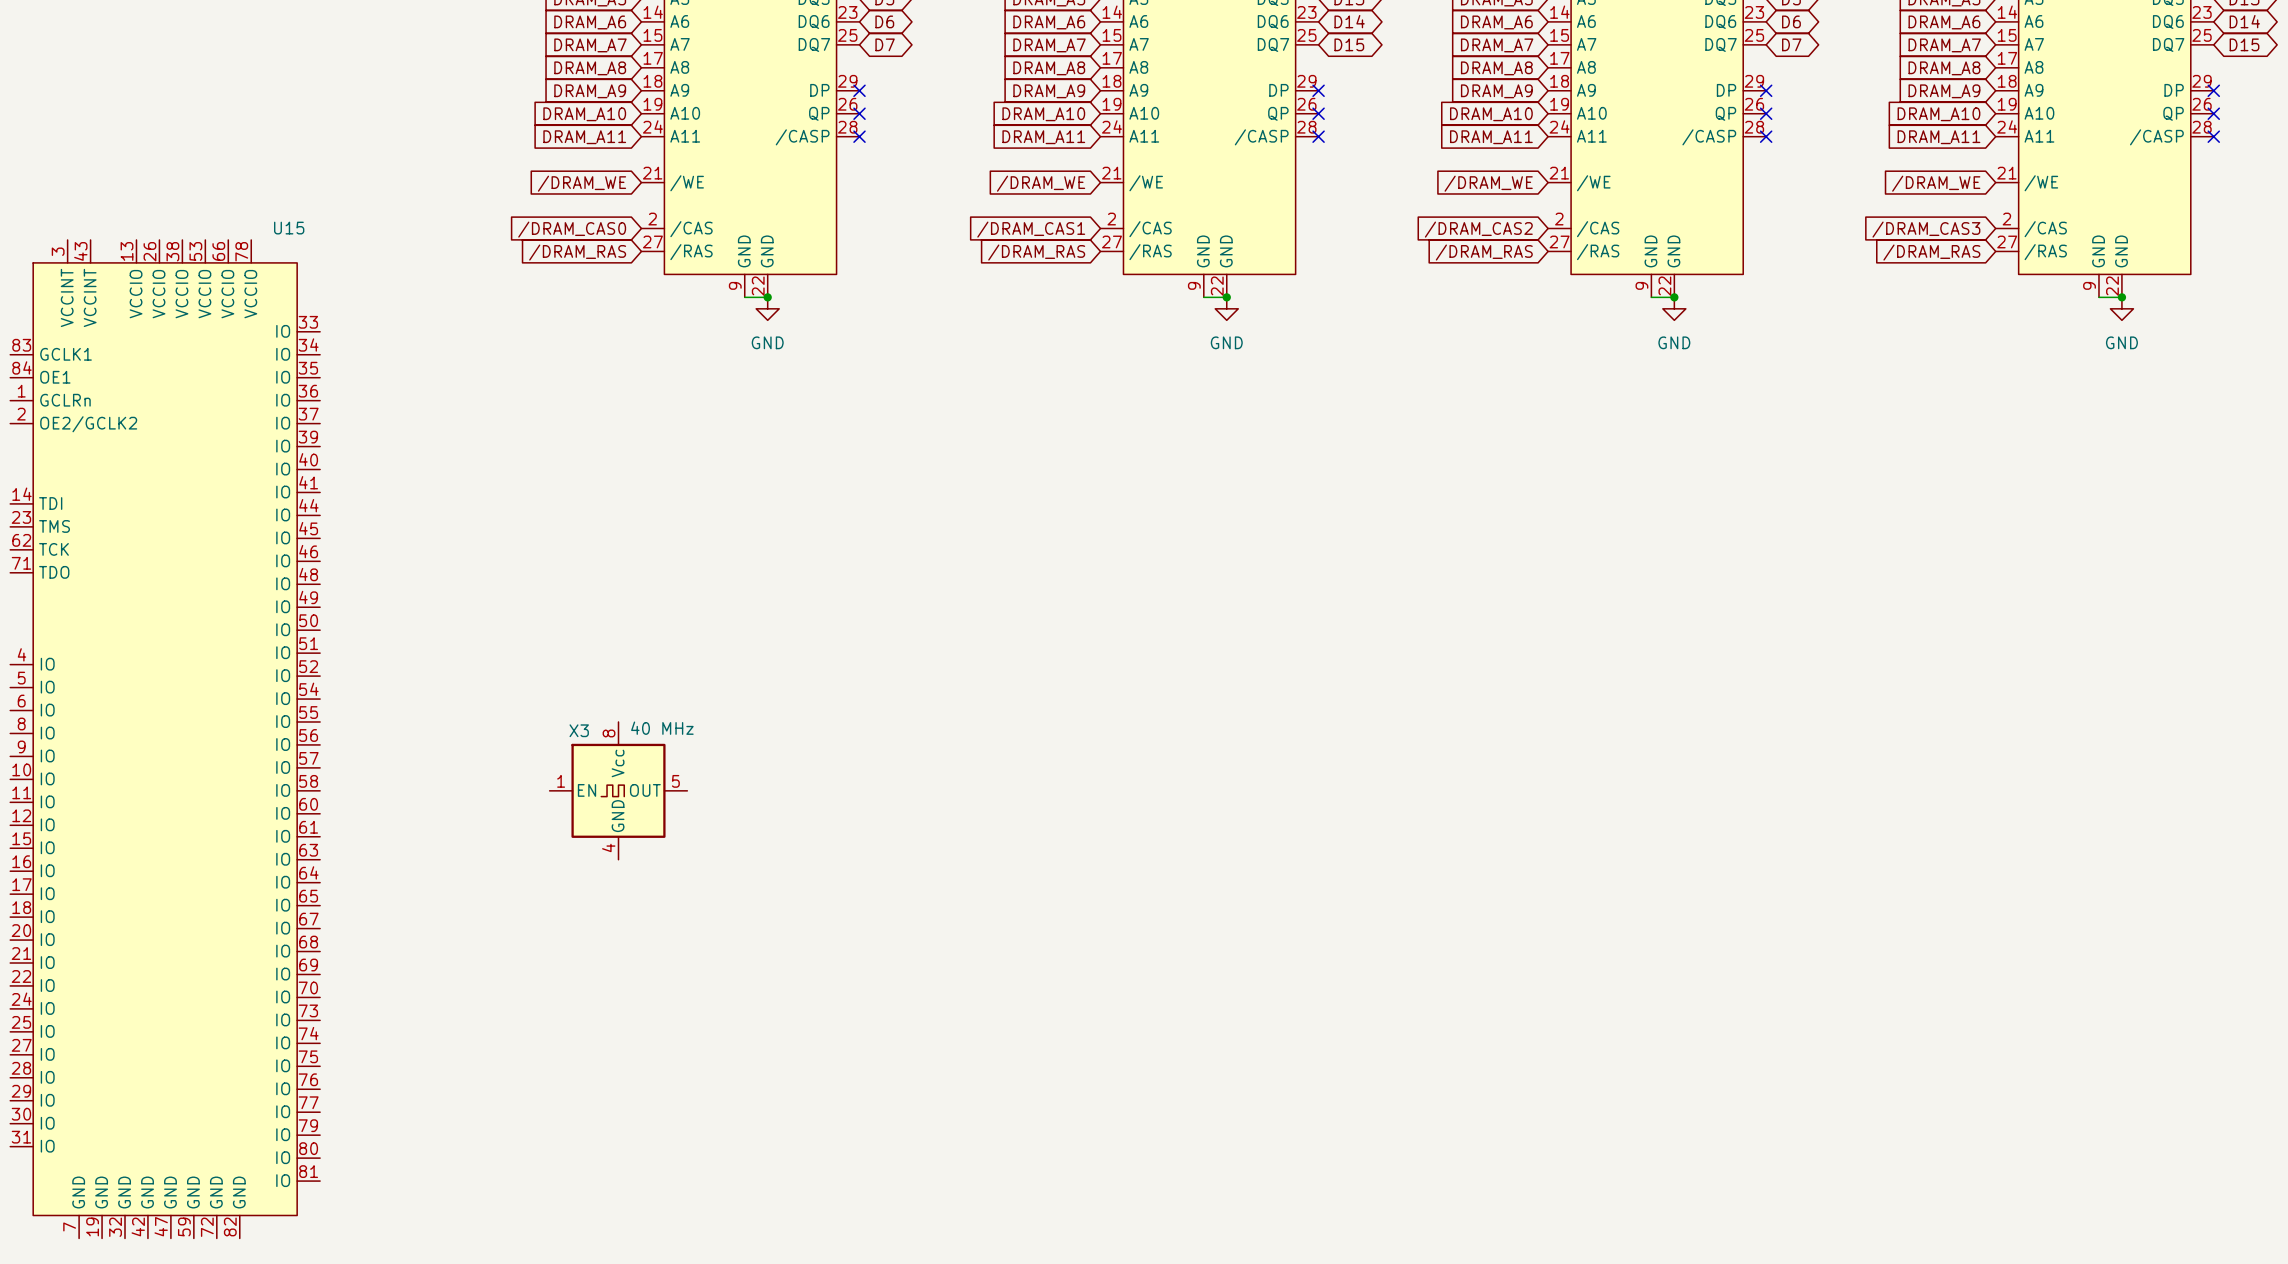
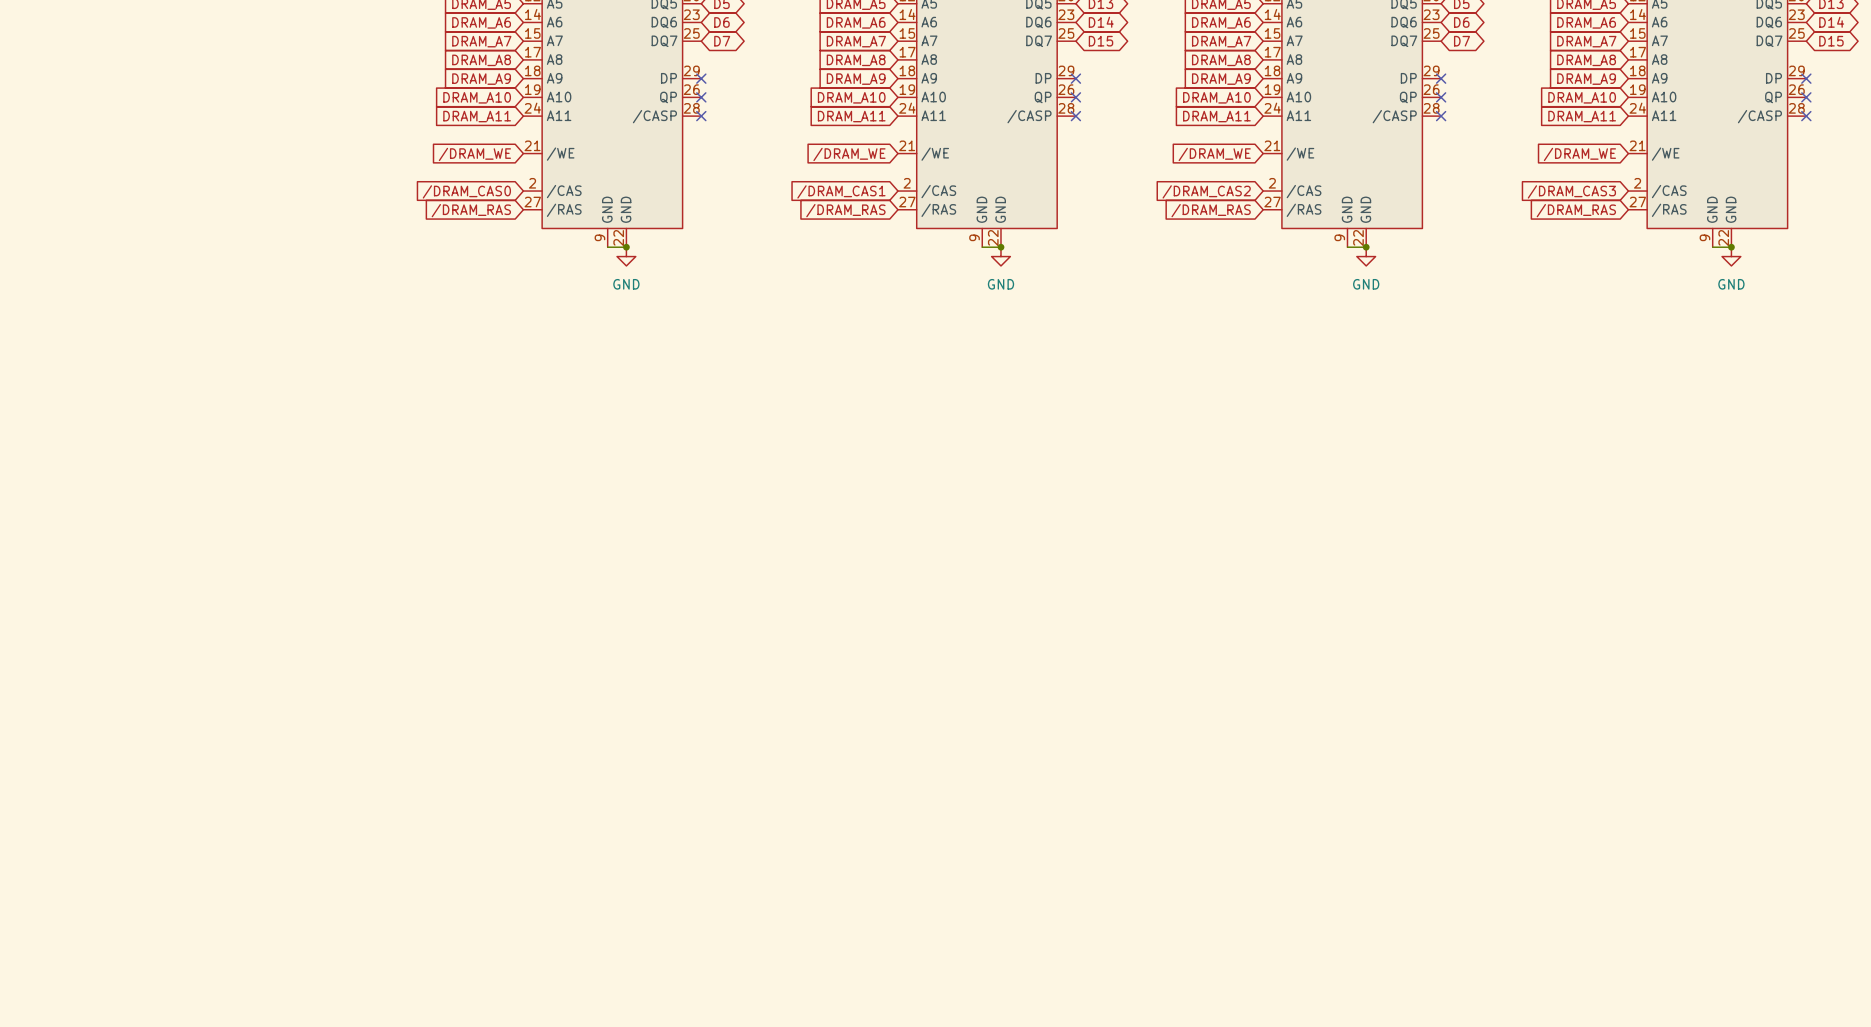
U15: (165, 739) -> none
X3: 40 MHz (618, 790) -> none

